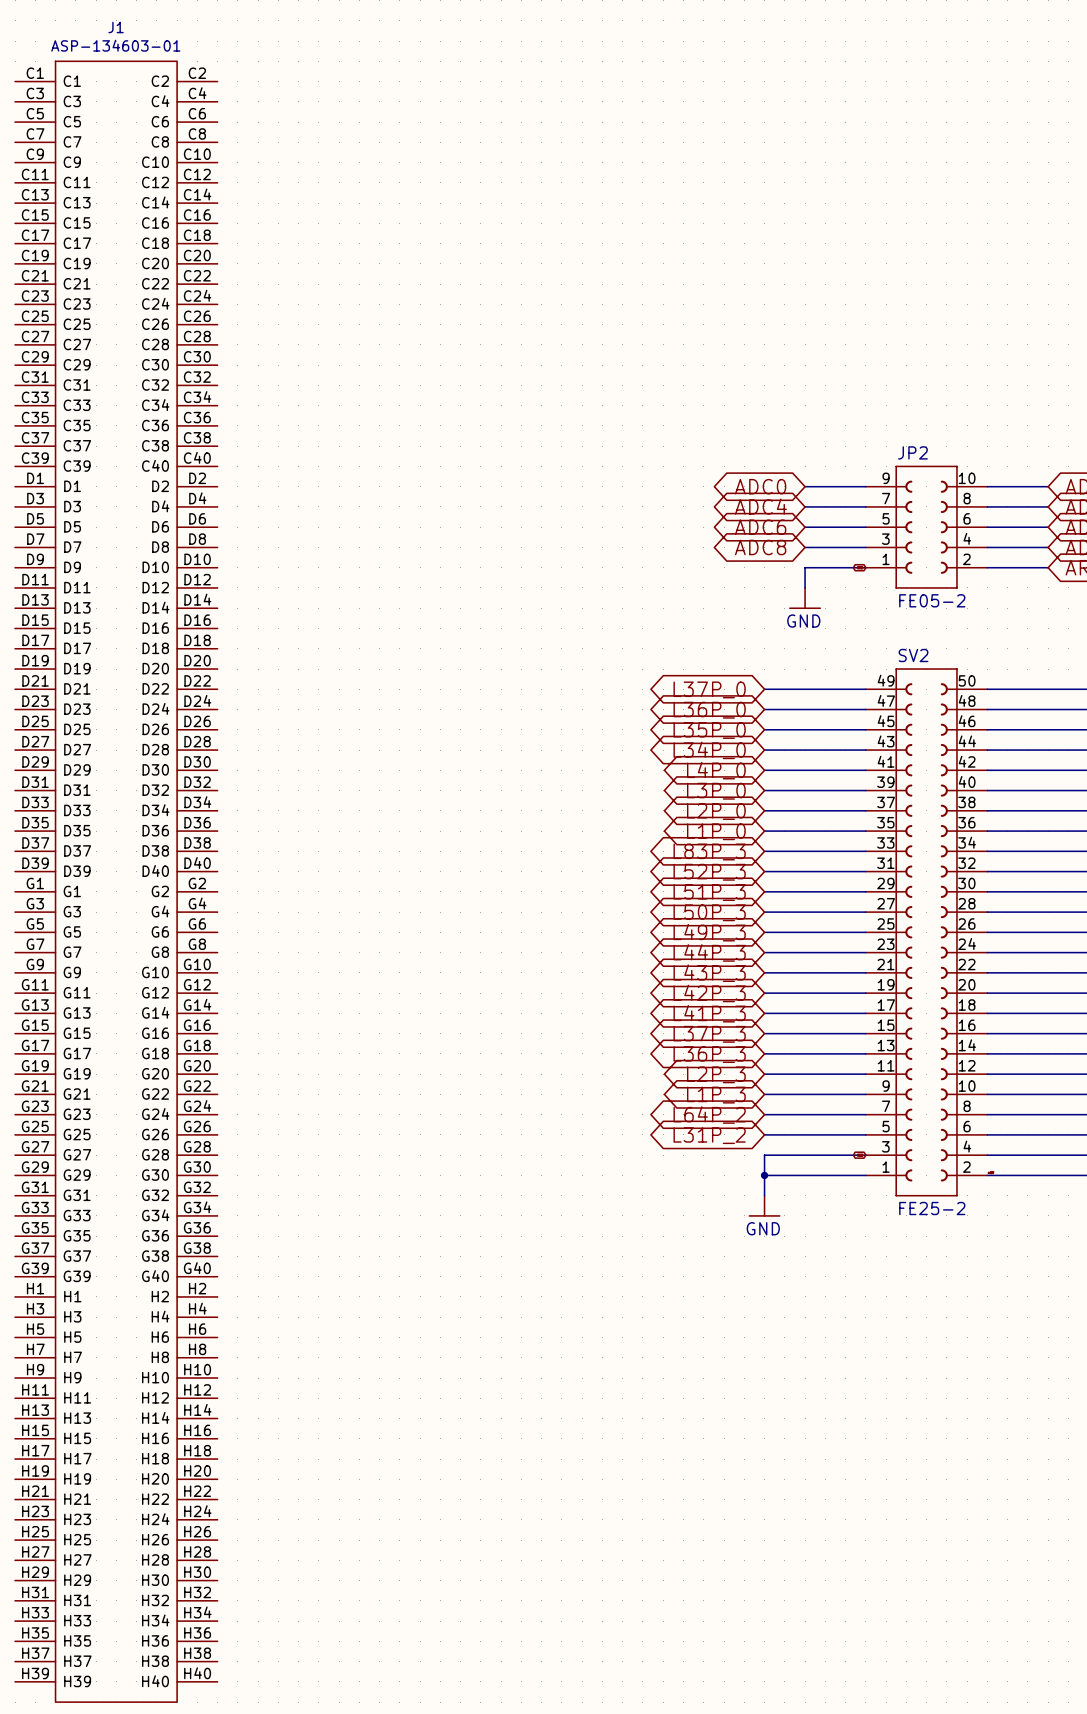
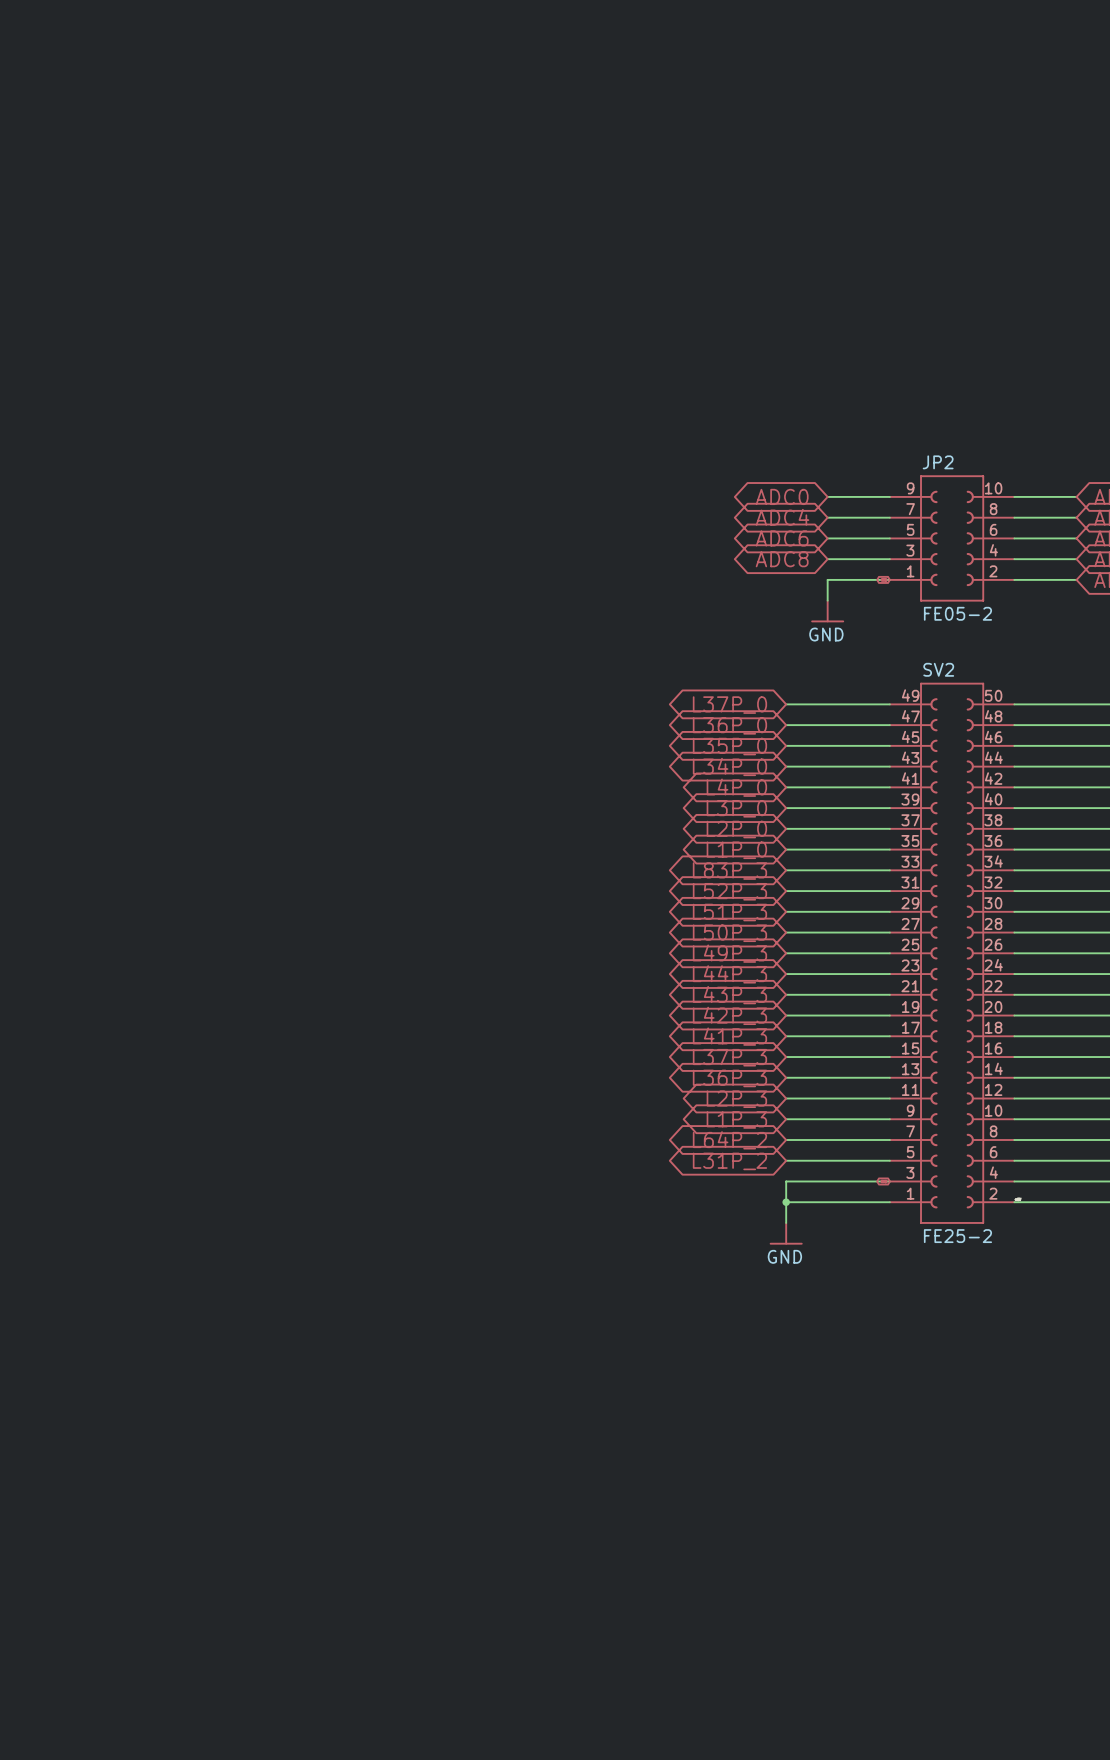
J1: ASP-134603-01 (116, 881) -> none

